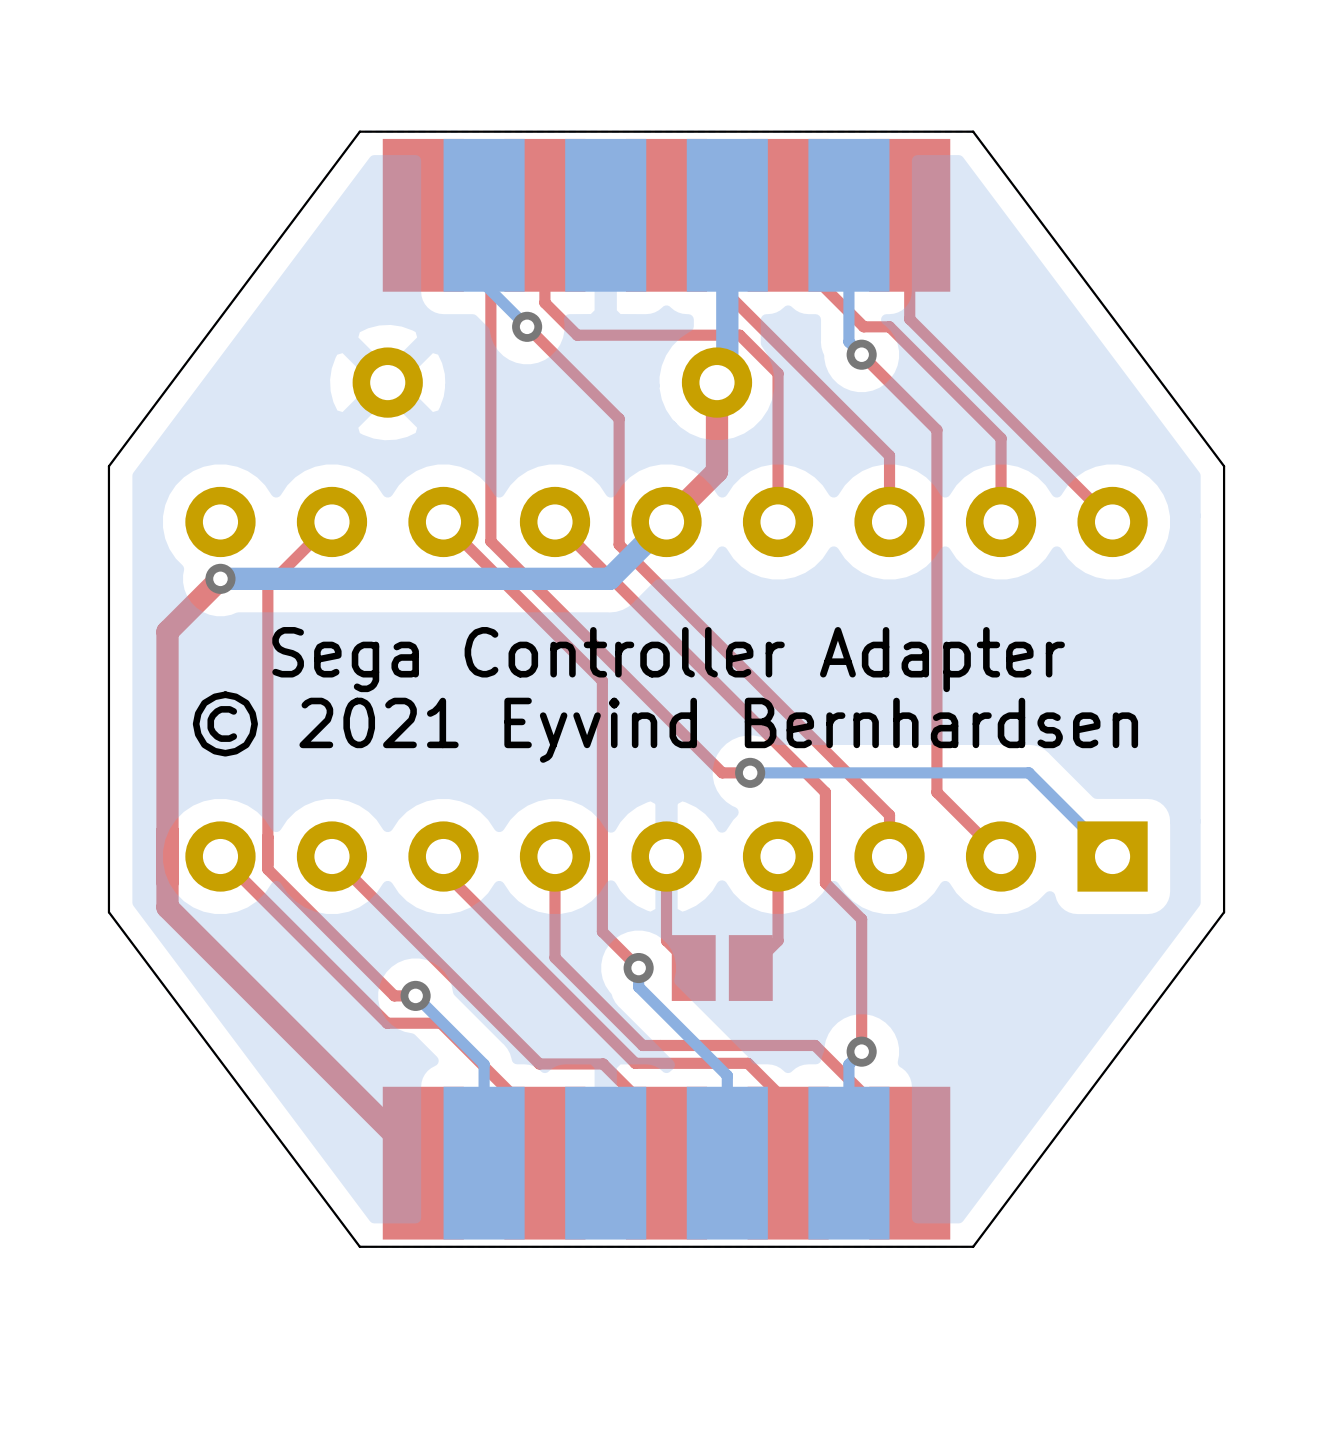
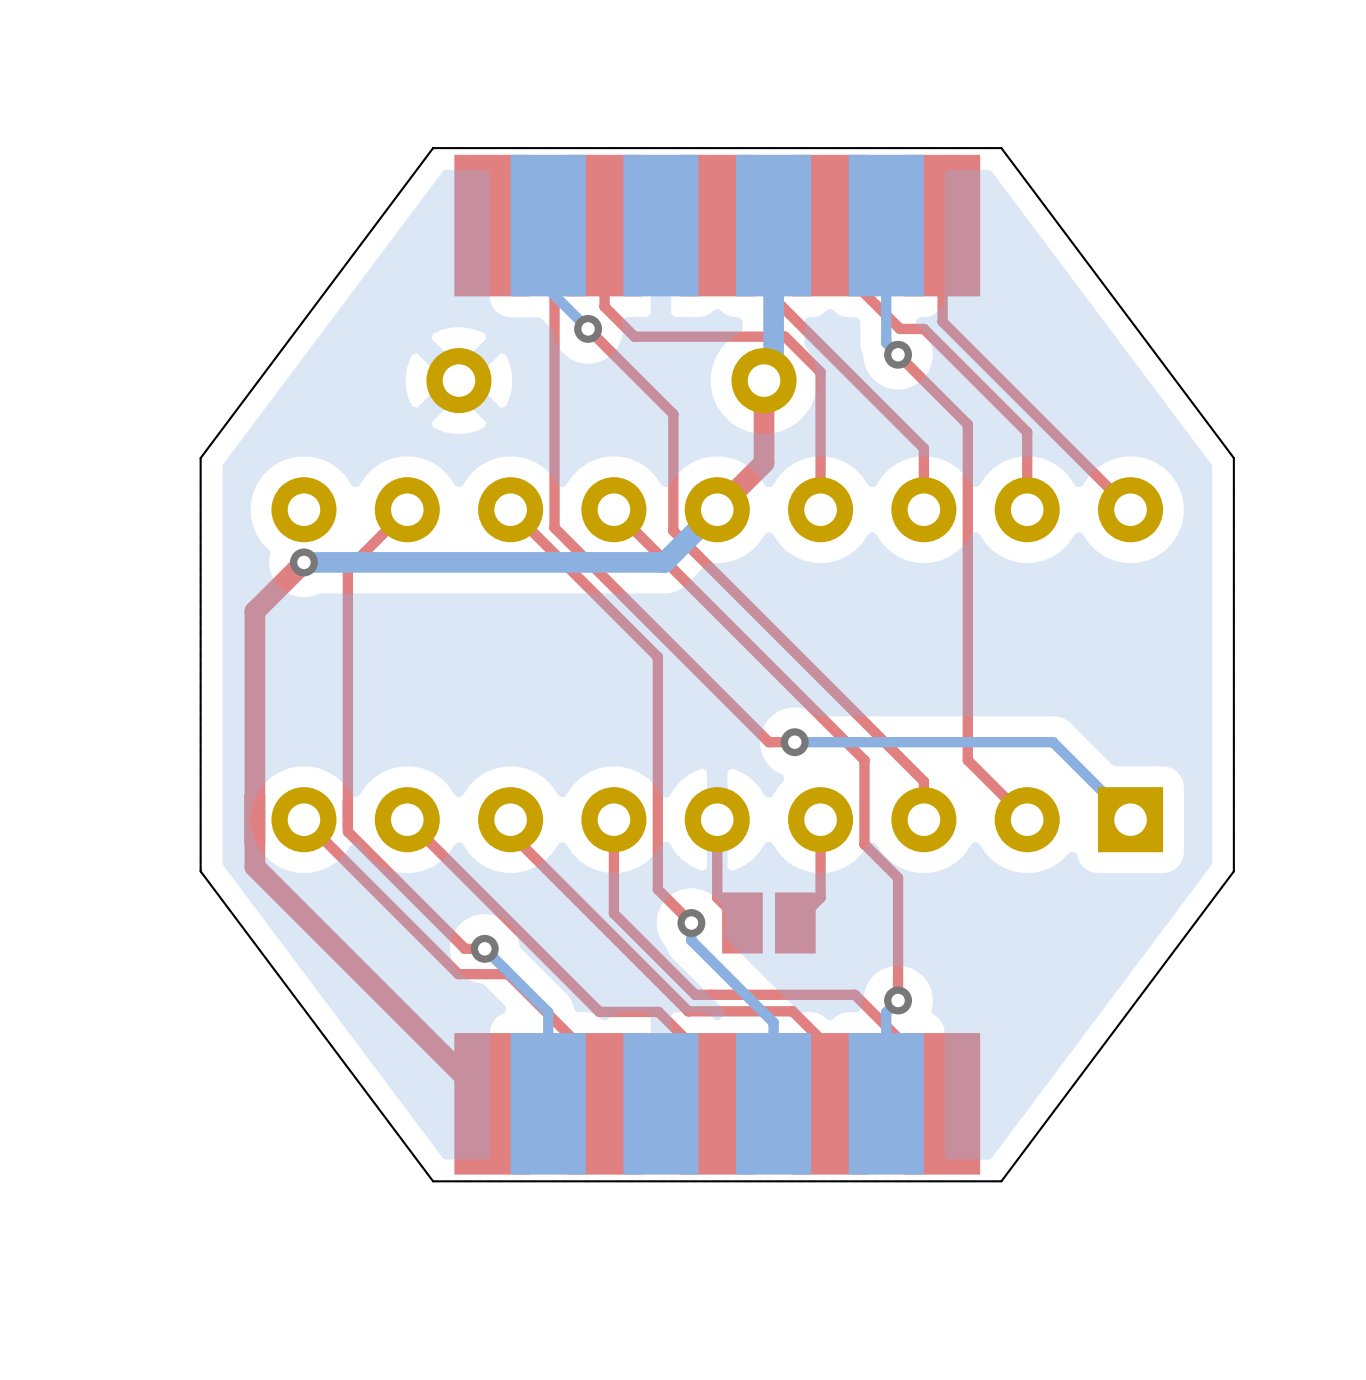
text: Sega Controller Adapter (668, 659) -> none
text: © 2021 Eyvind Bernhardsen (665, 727) -> none

